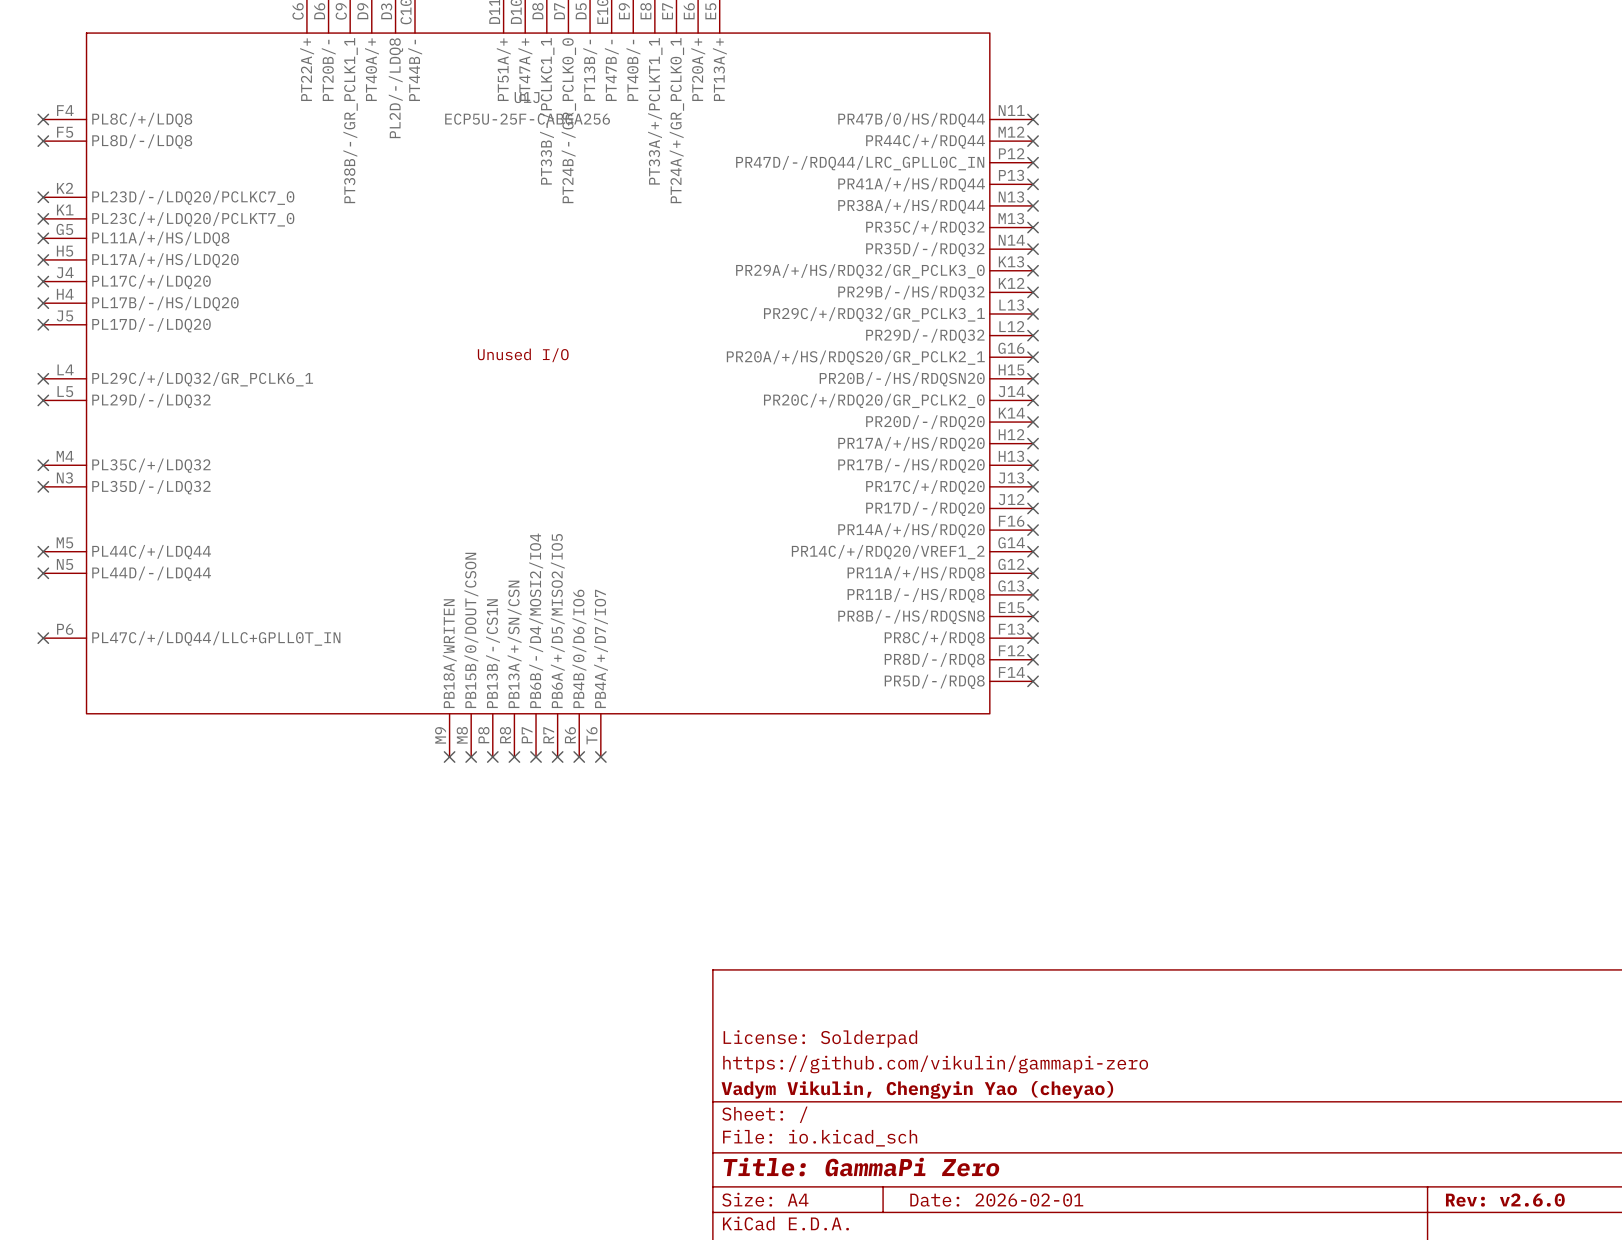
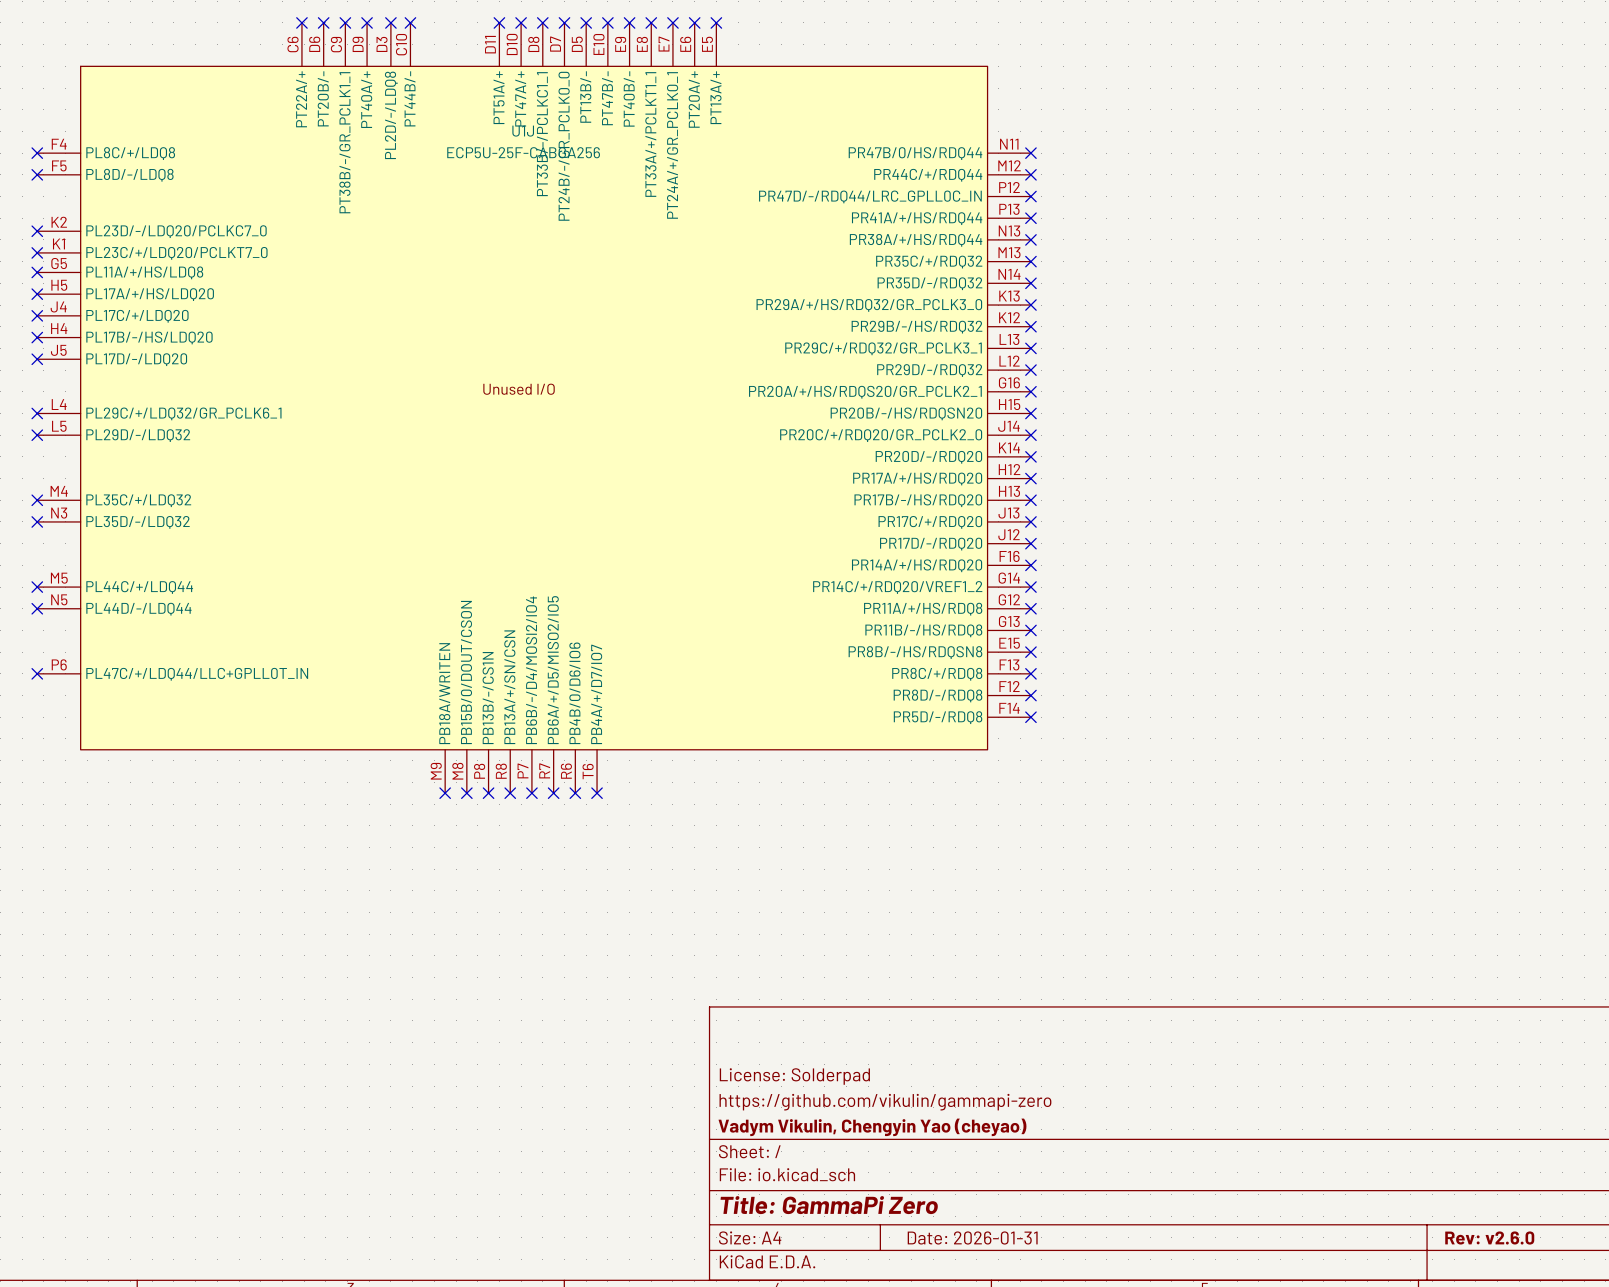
title block: Date: 2026-02-01 (996, 1200) -> Date: 2026-01-31 (972, 1237)

